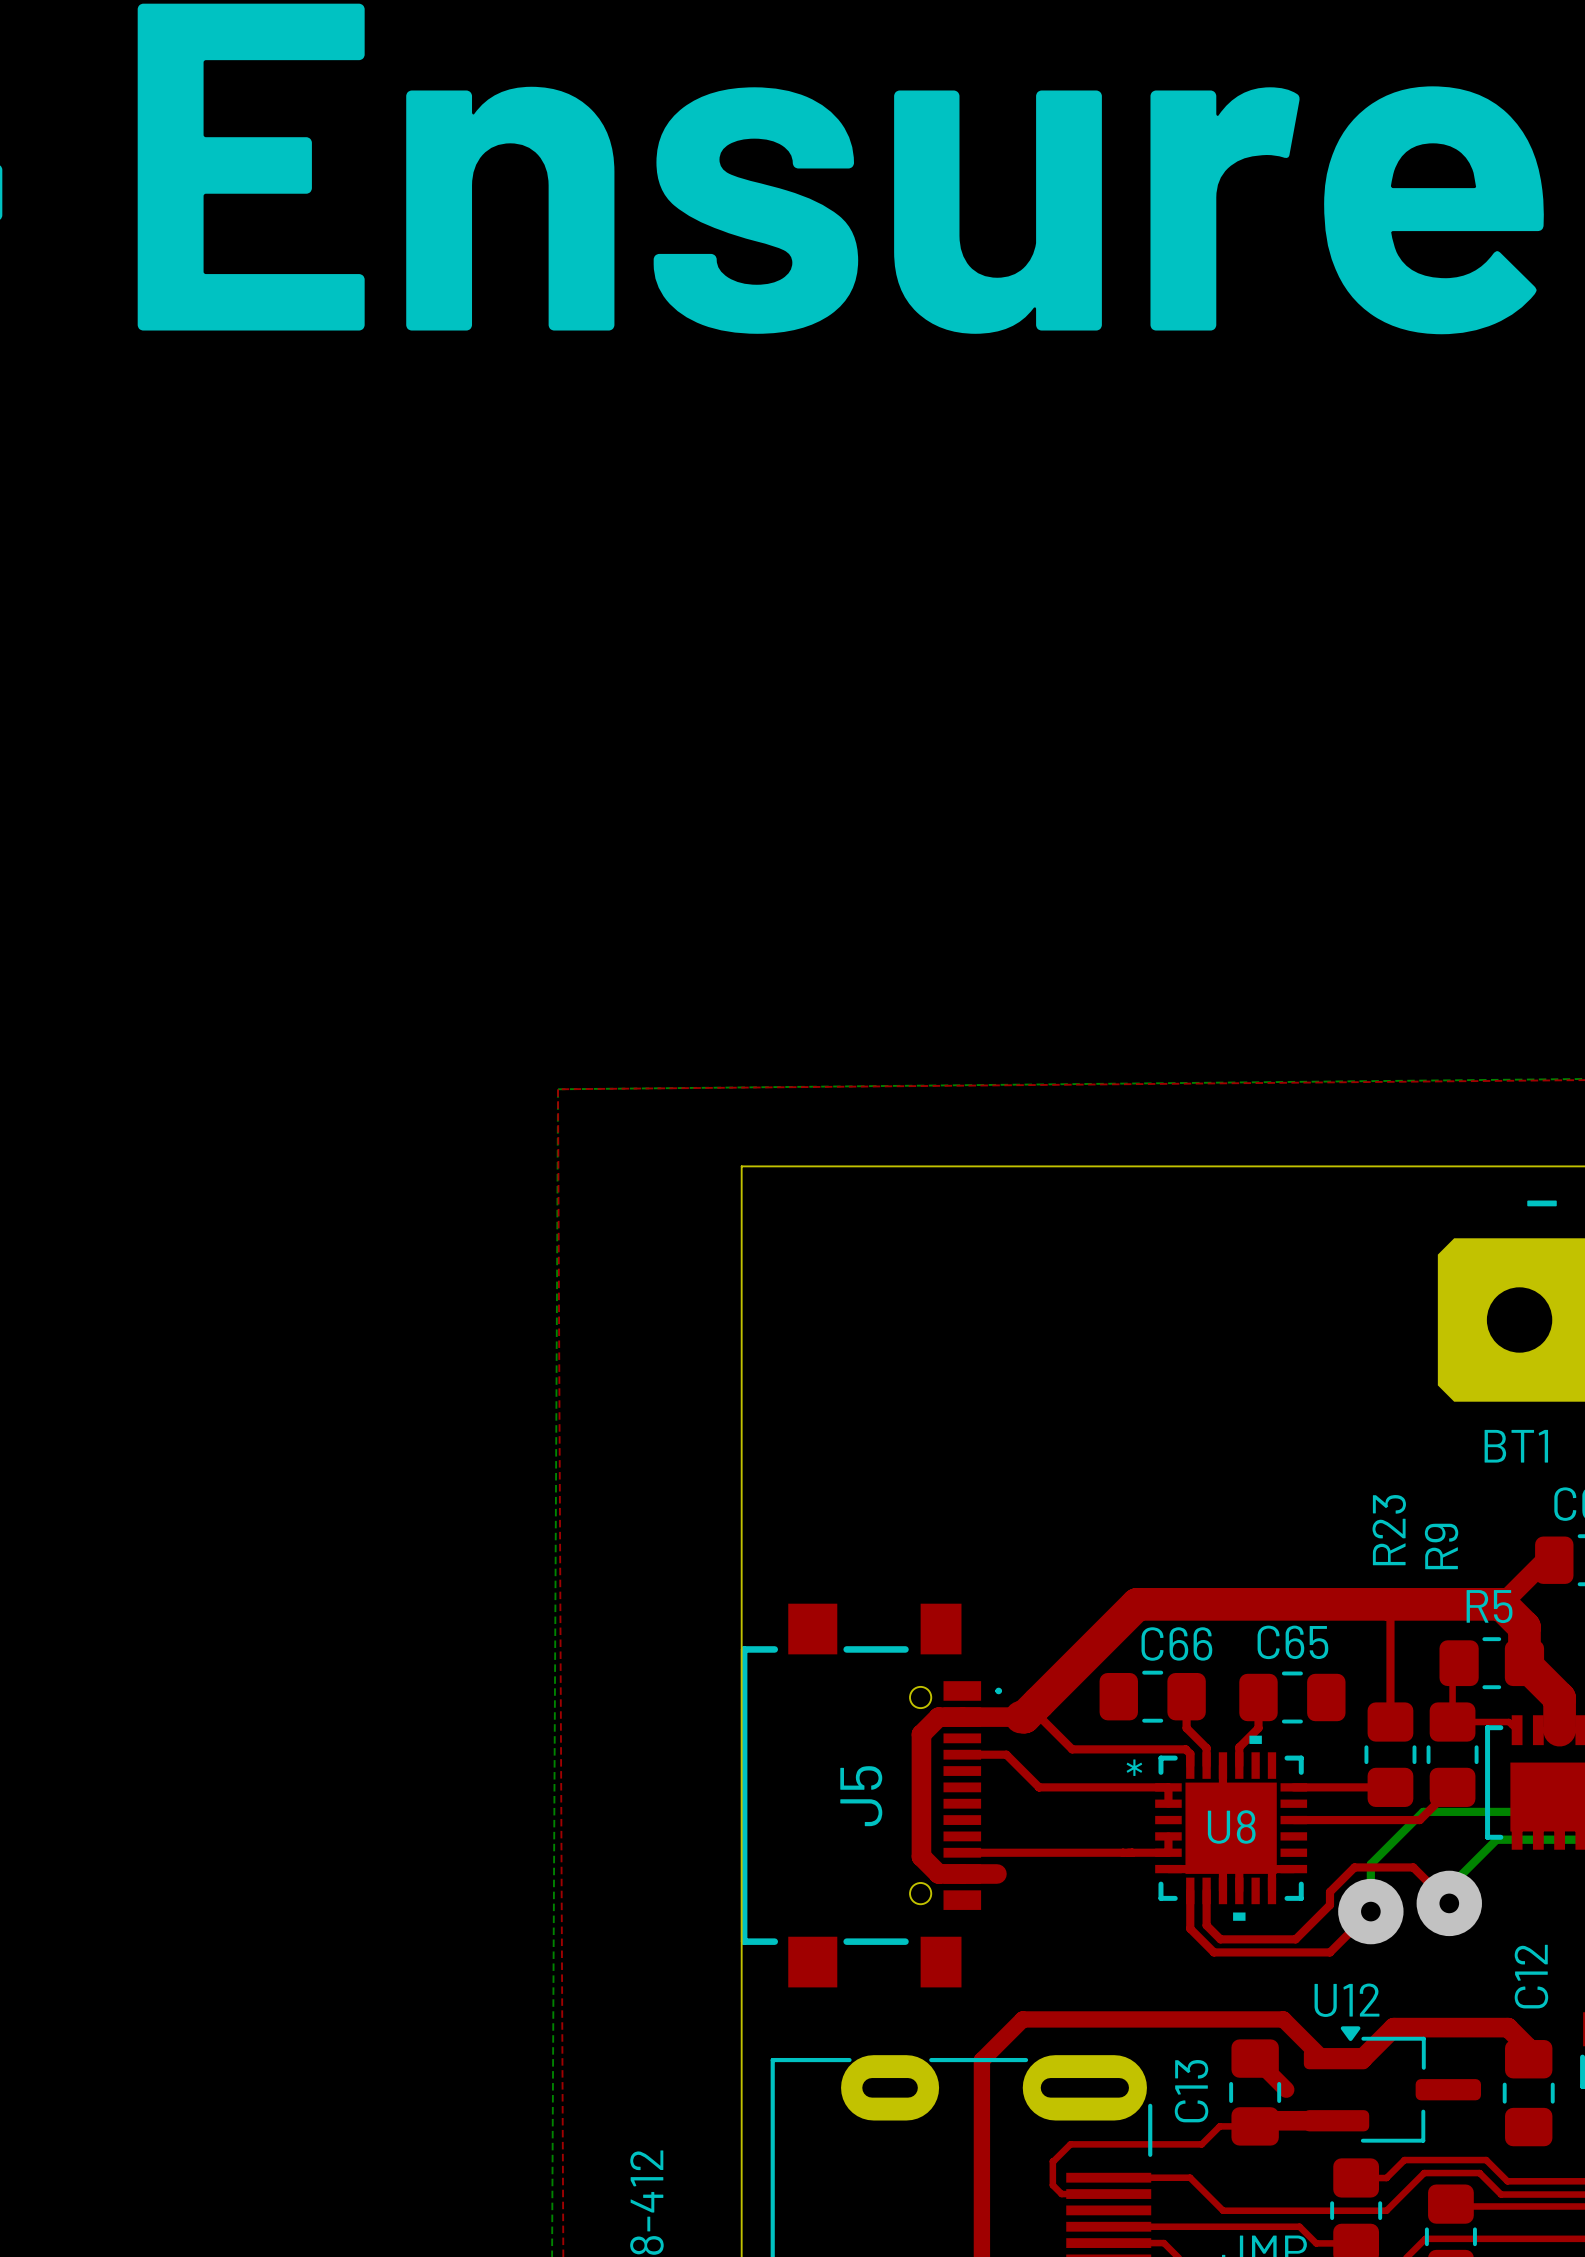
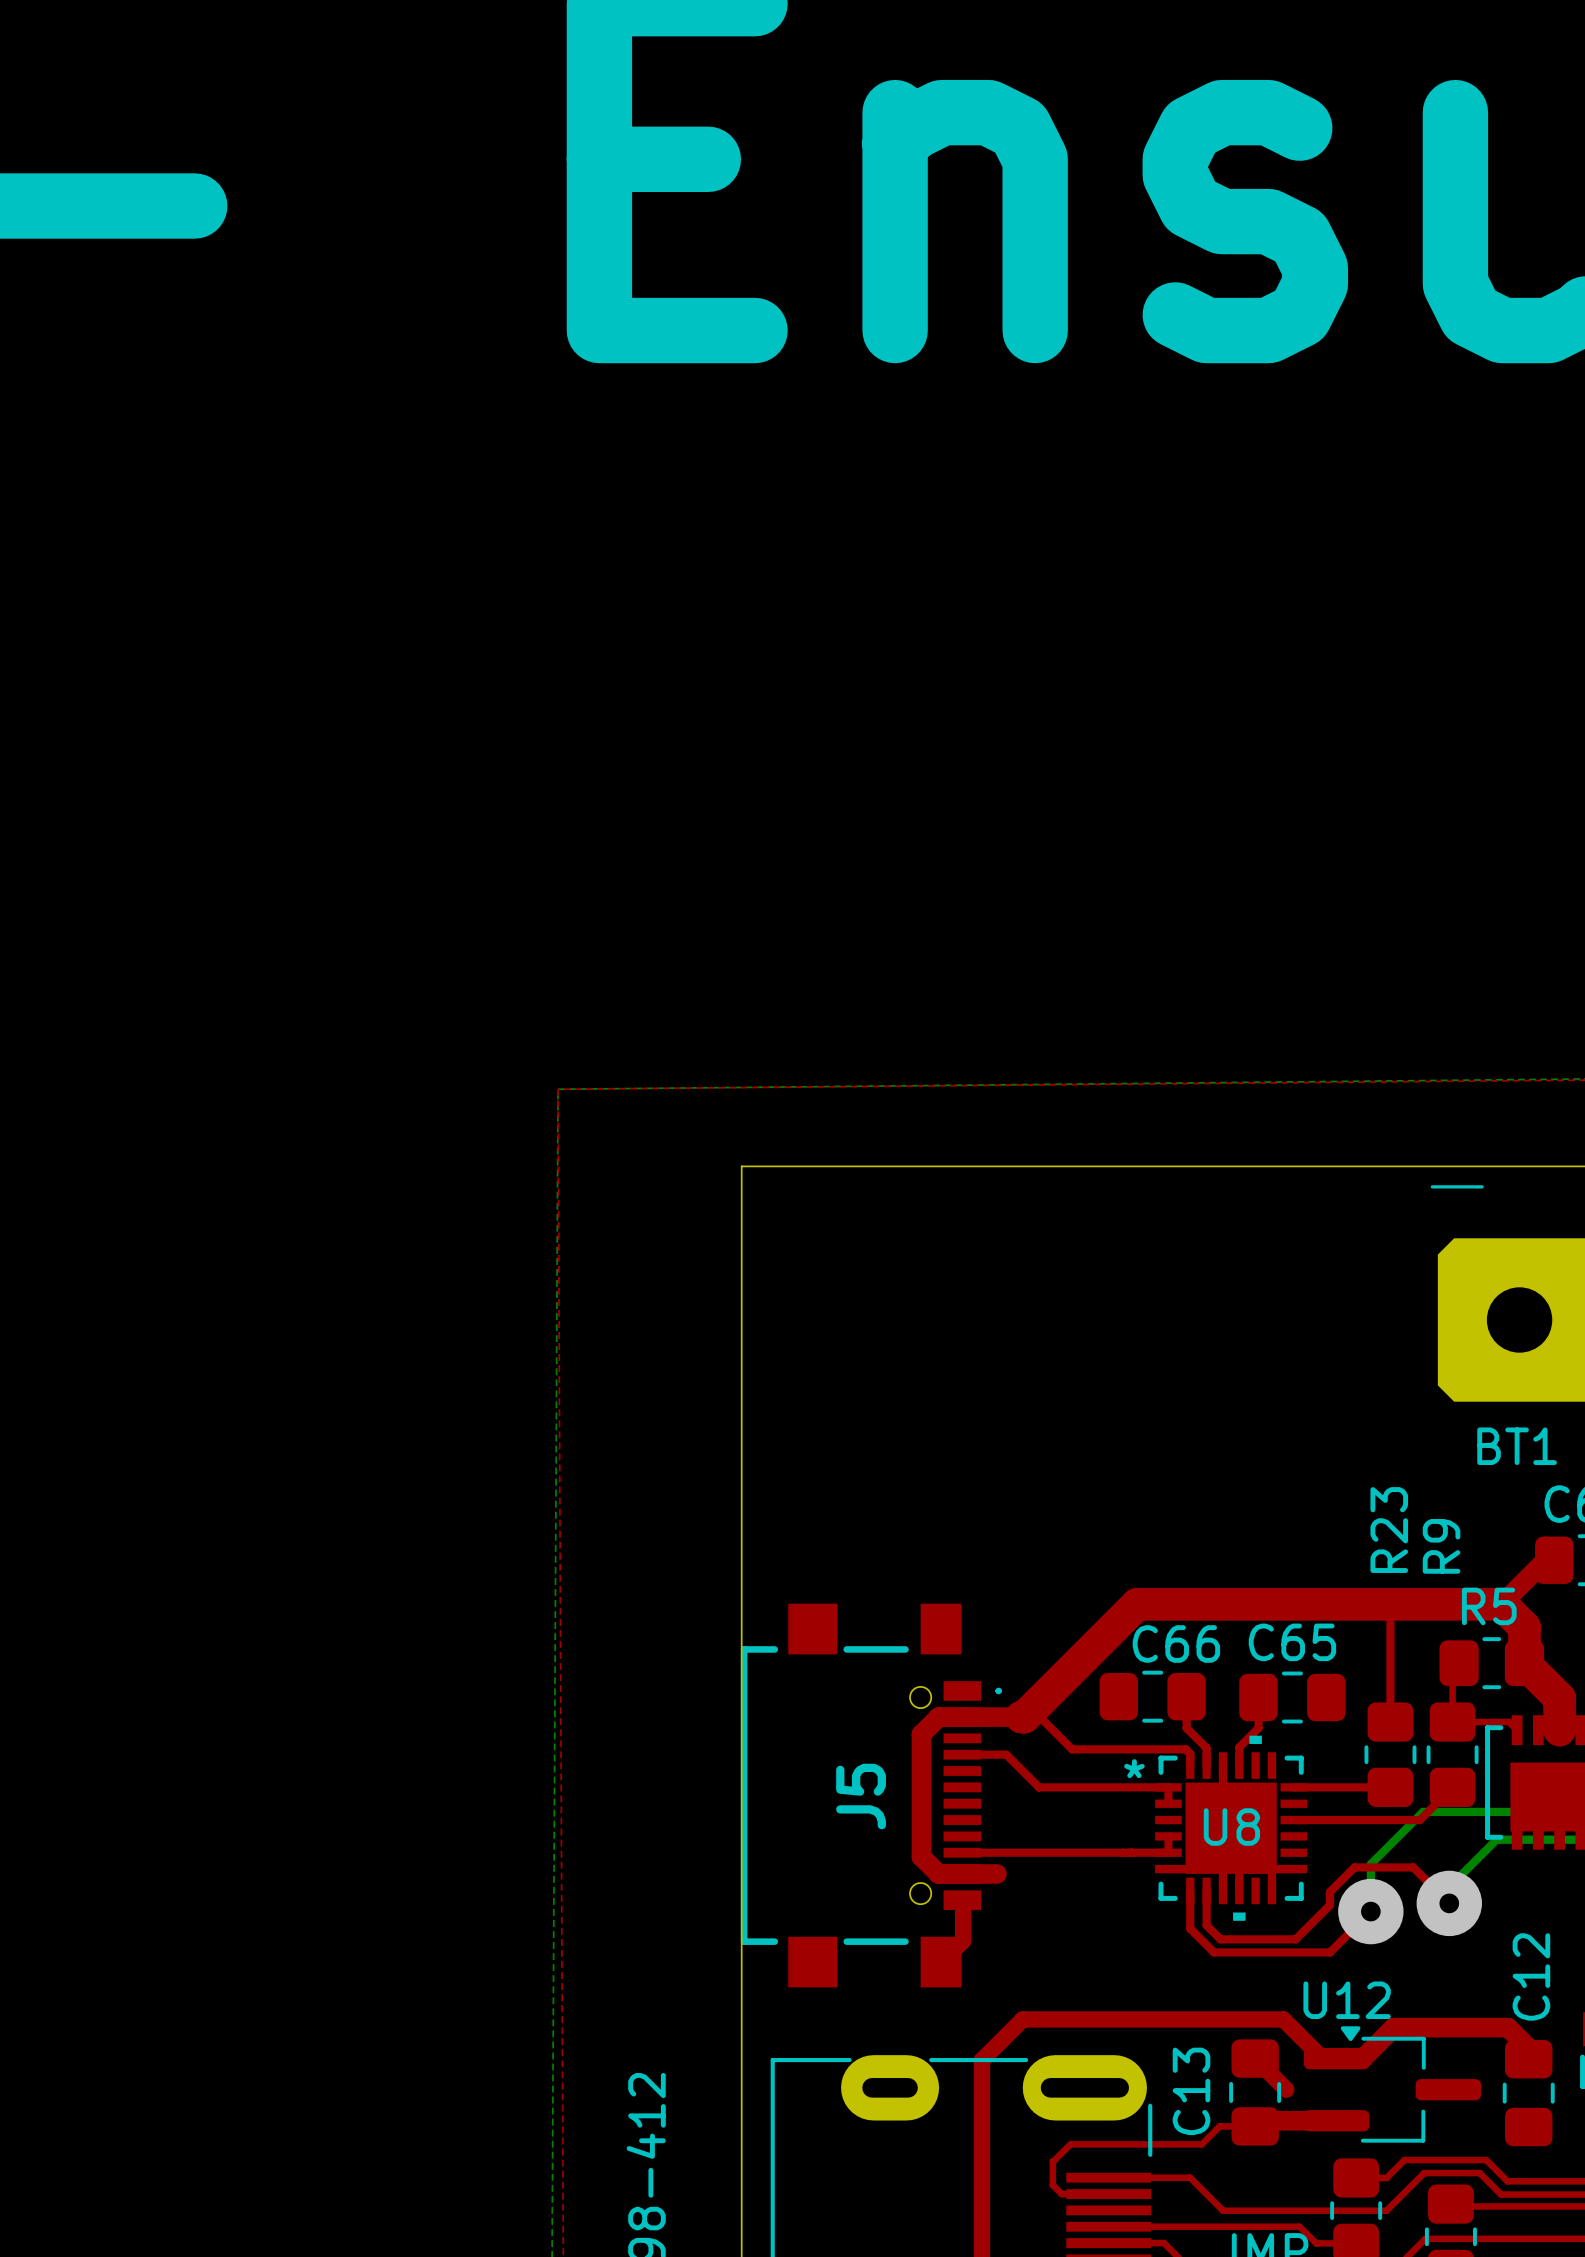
BT1 text position: - (1542, 1203) -> - (1457, 1186)
top track: none -> (963, 1900) (963, 1940) (941, 1962)

